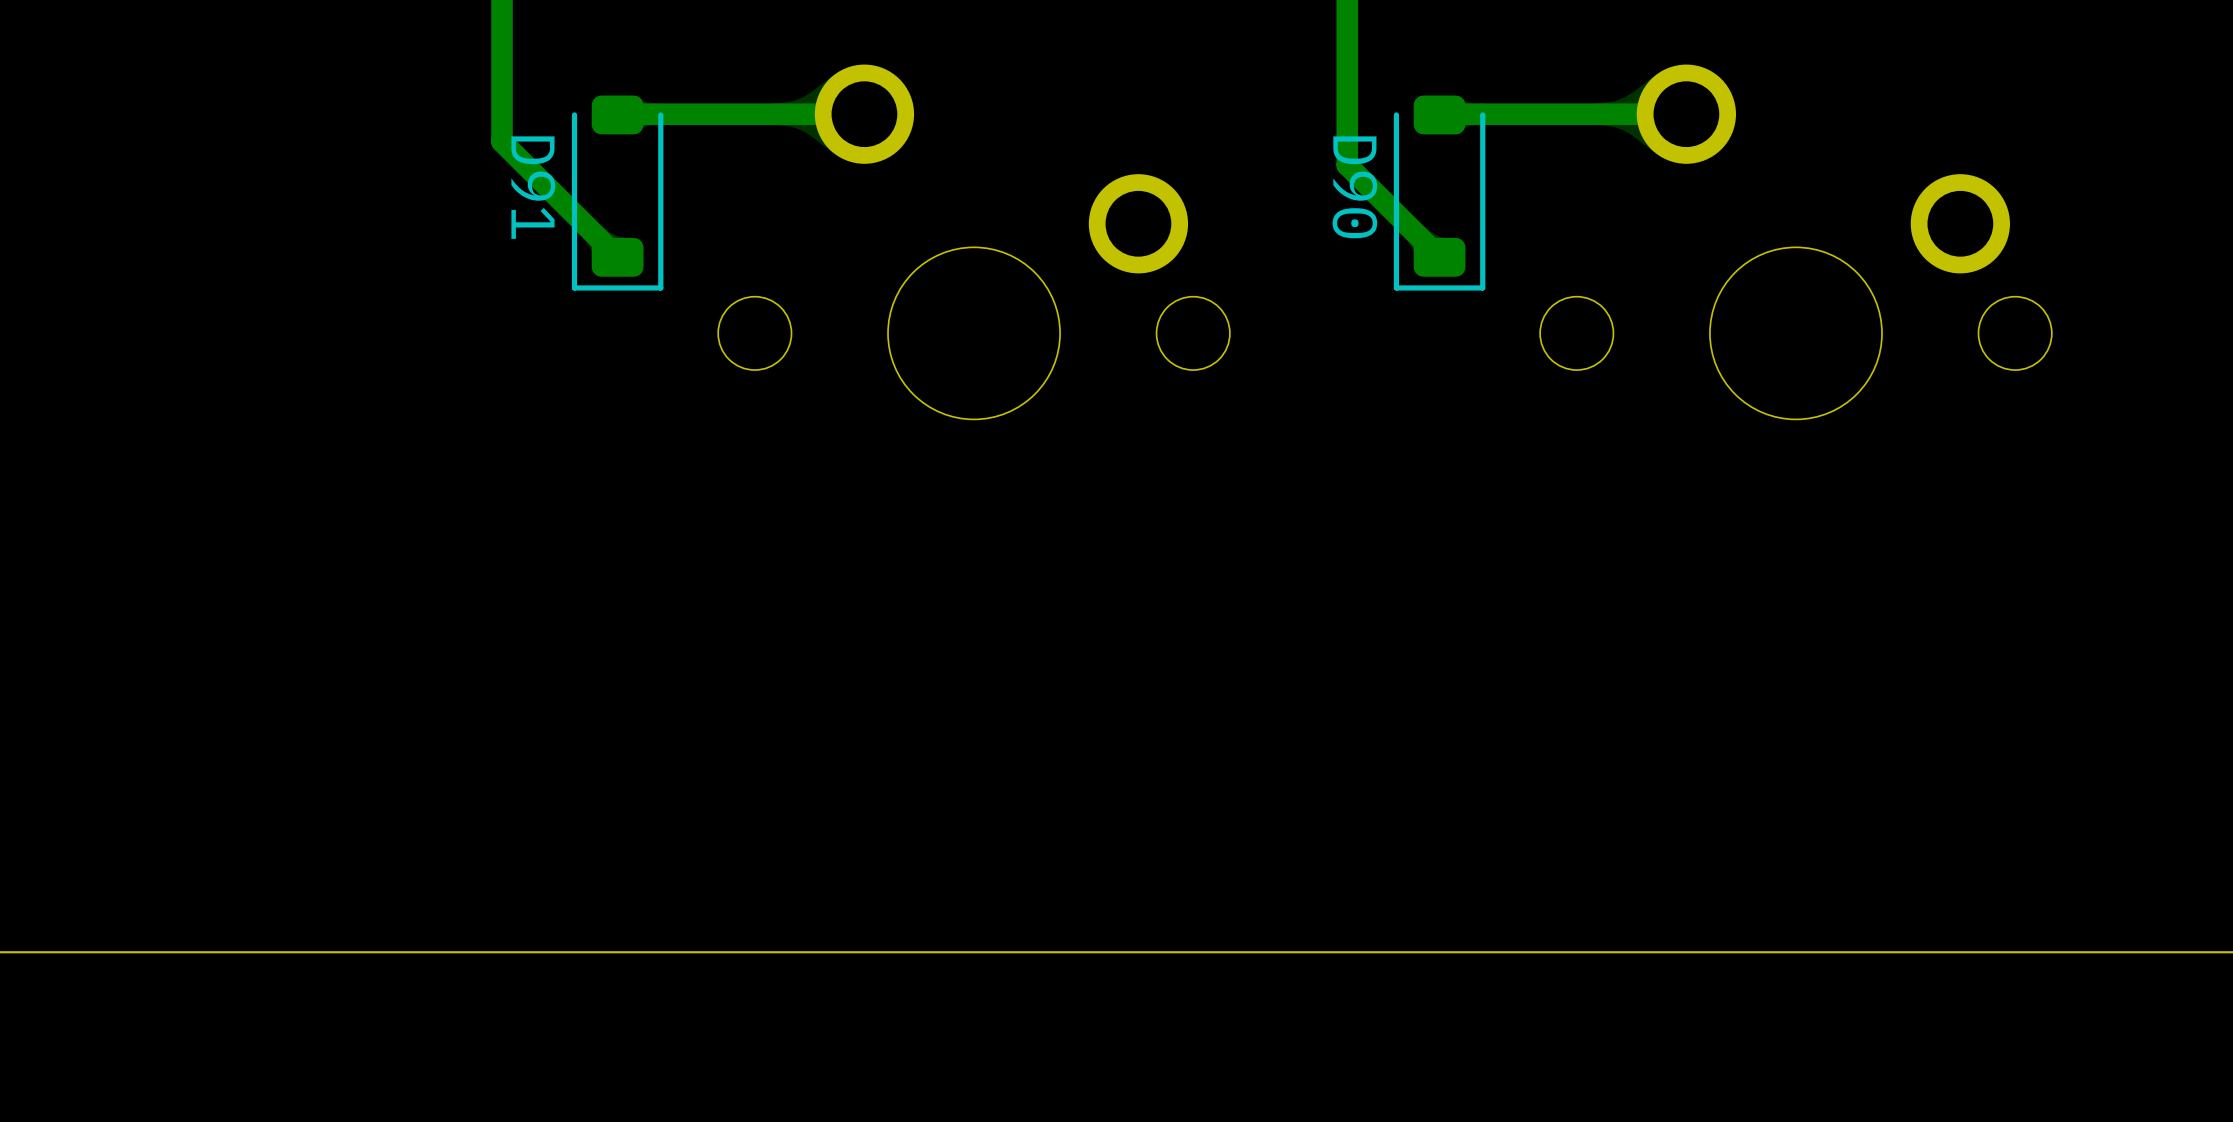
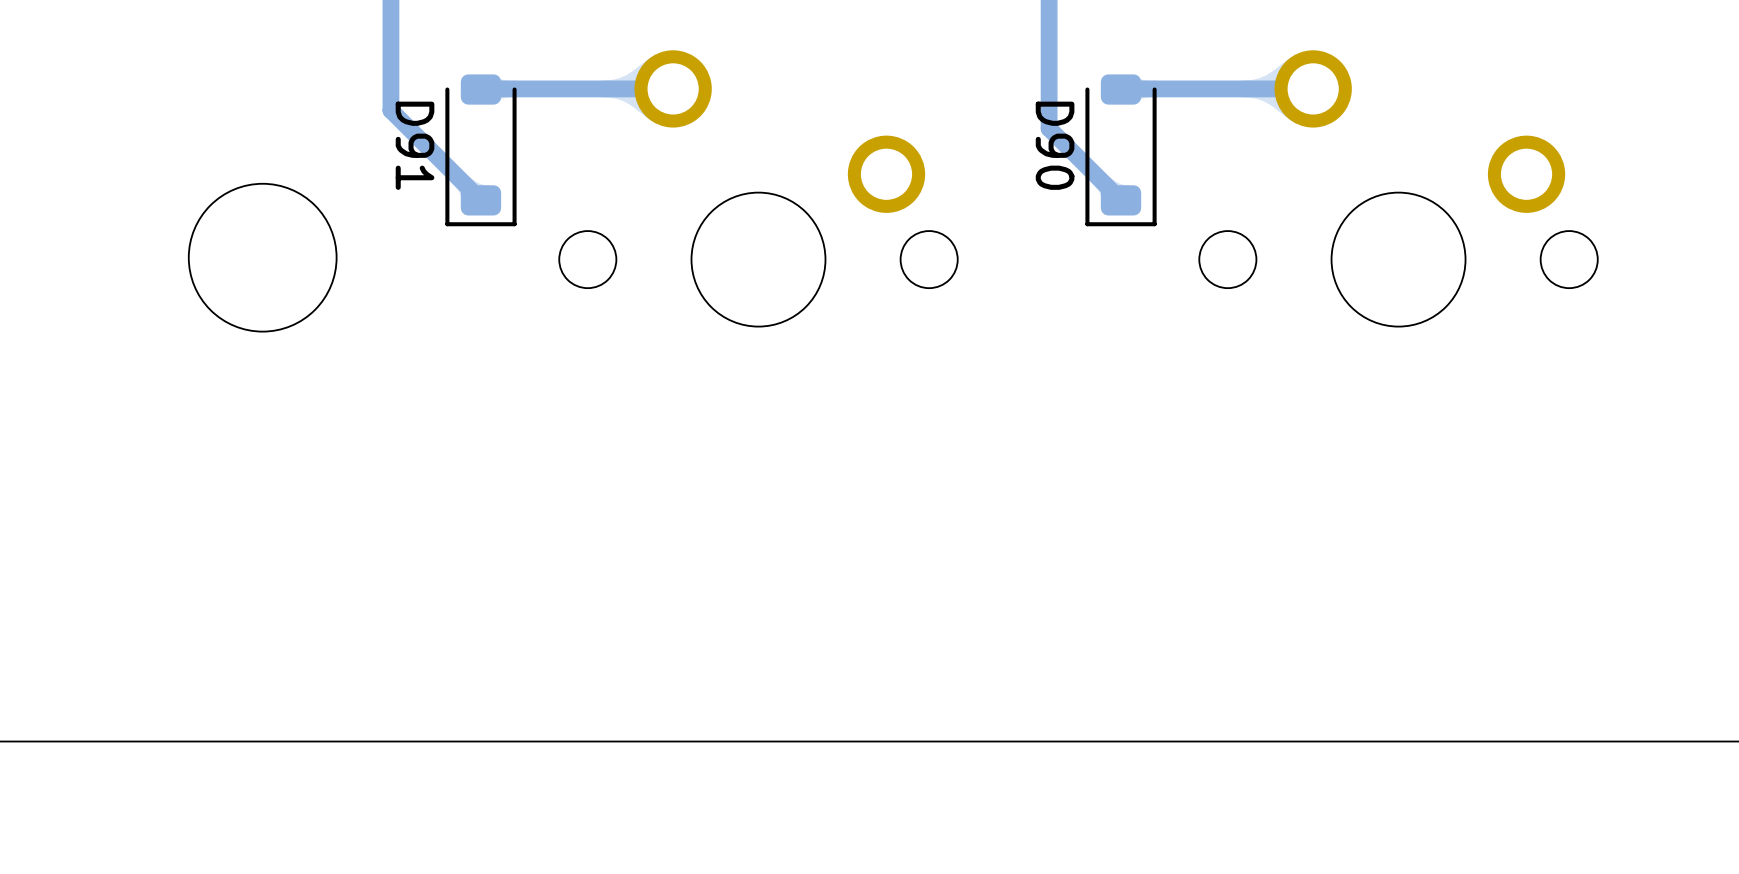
round board edge: none -> [187, 182, 338, 333]

